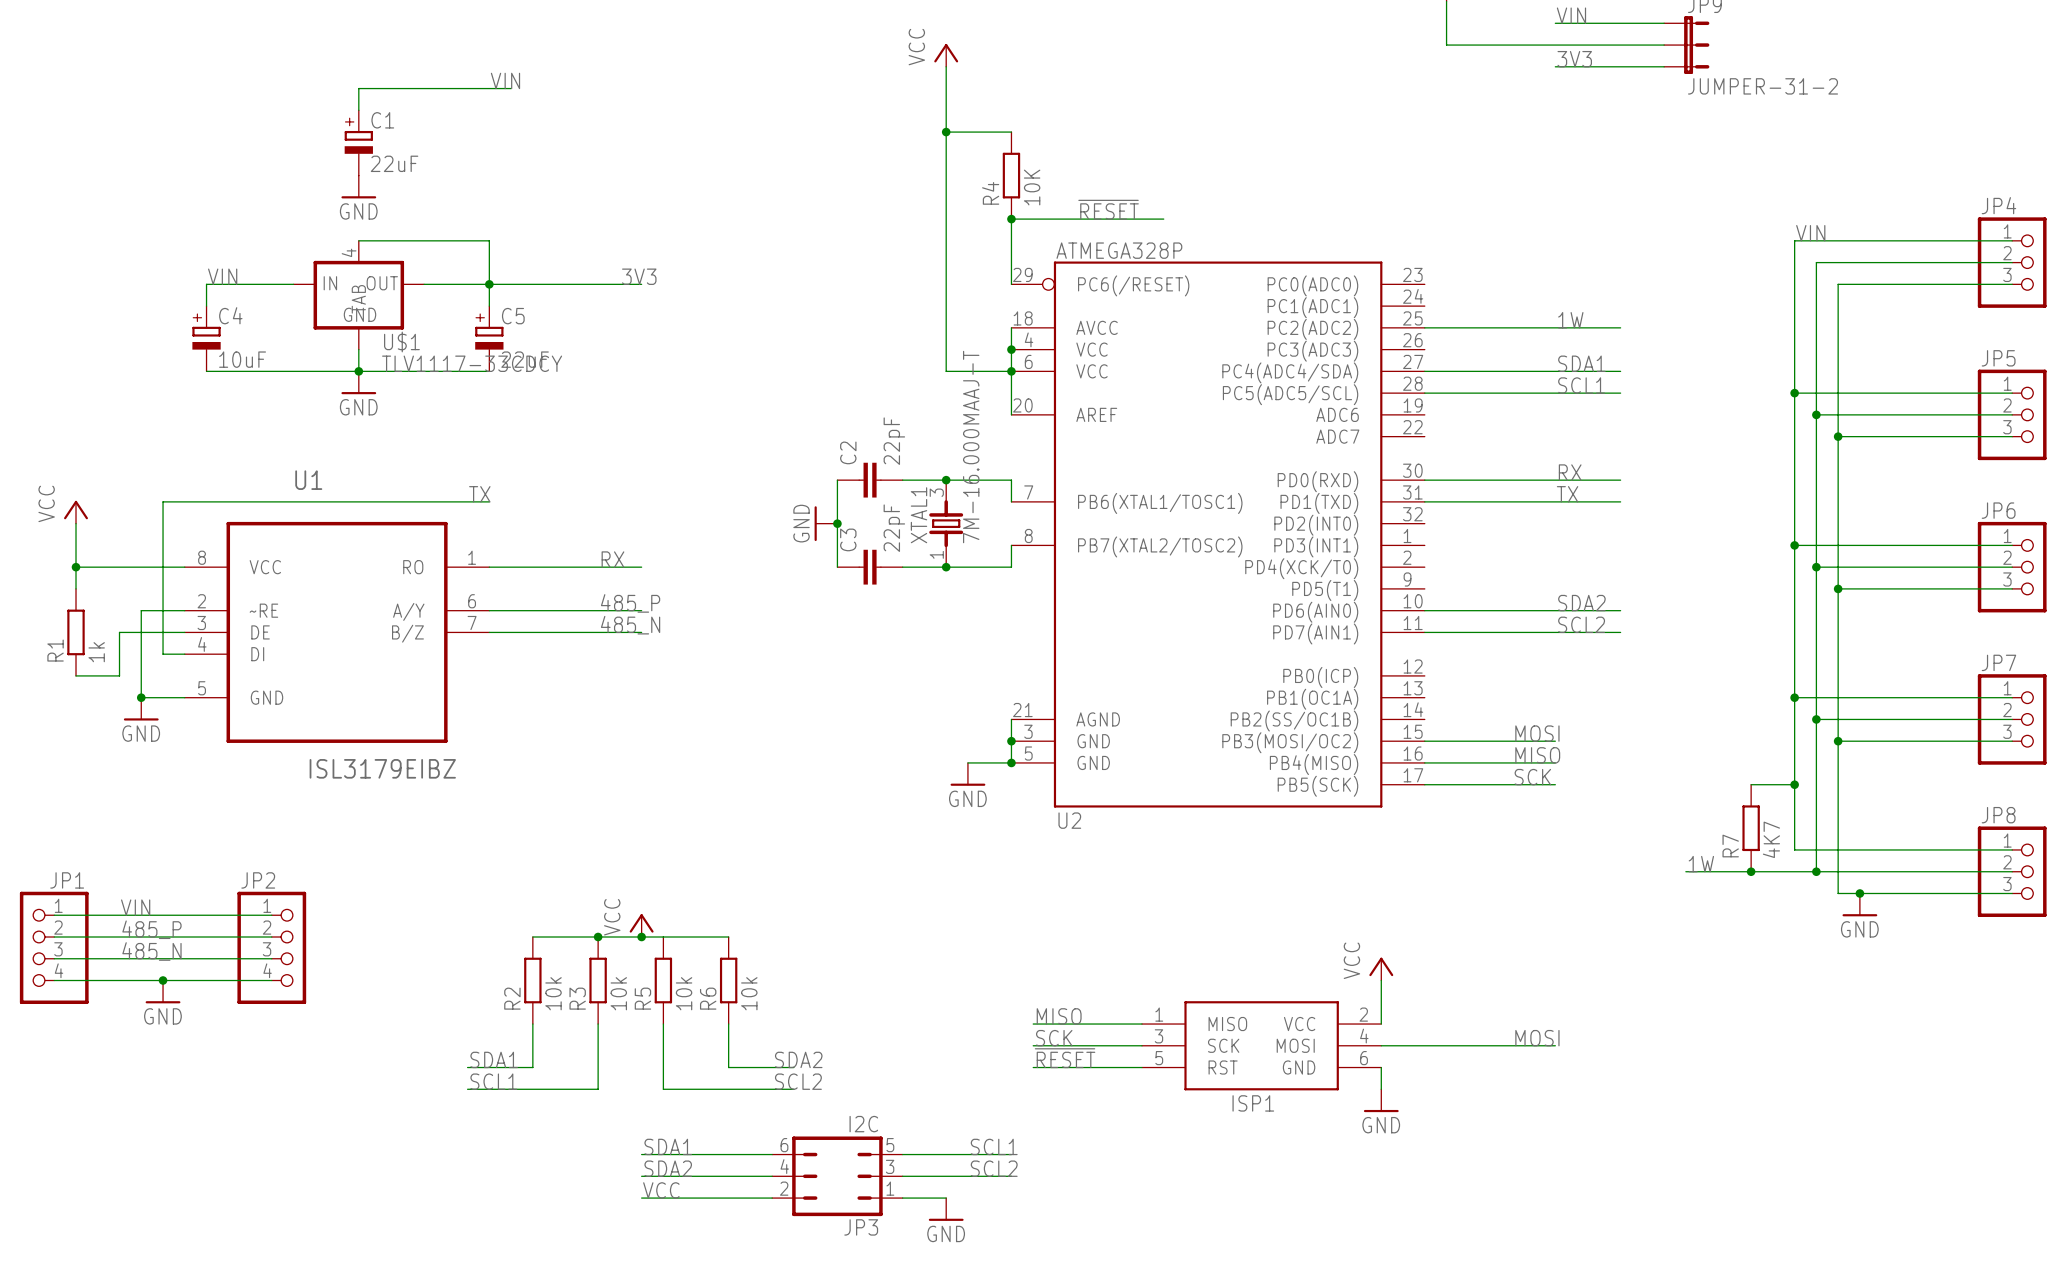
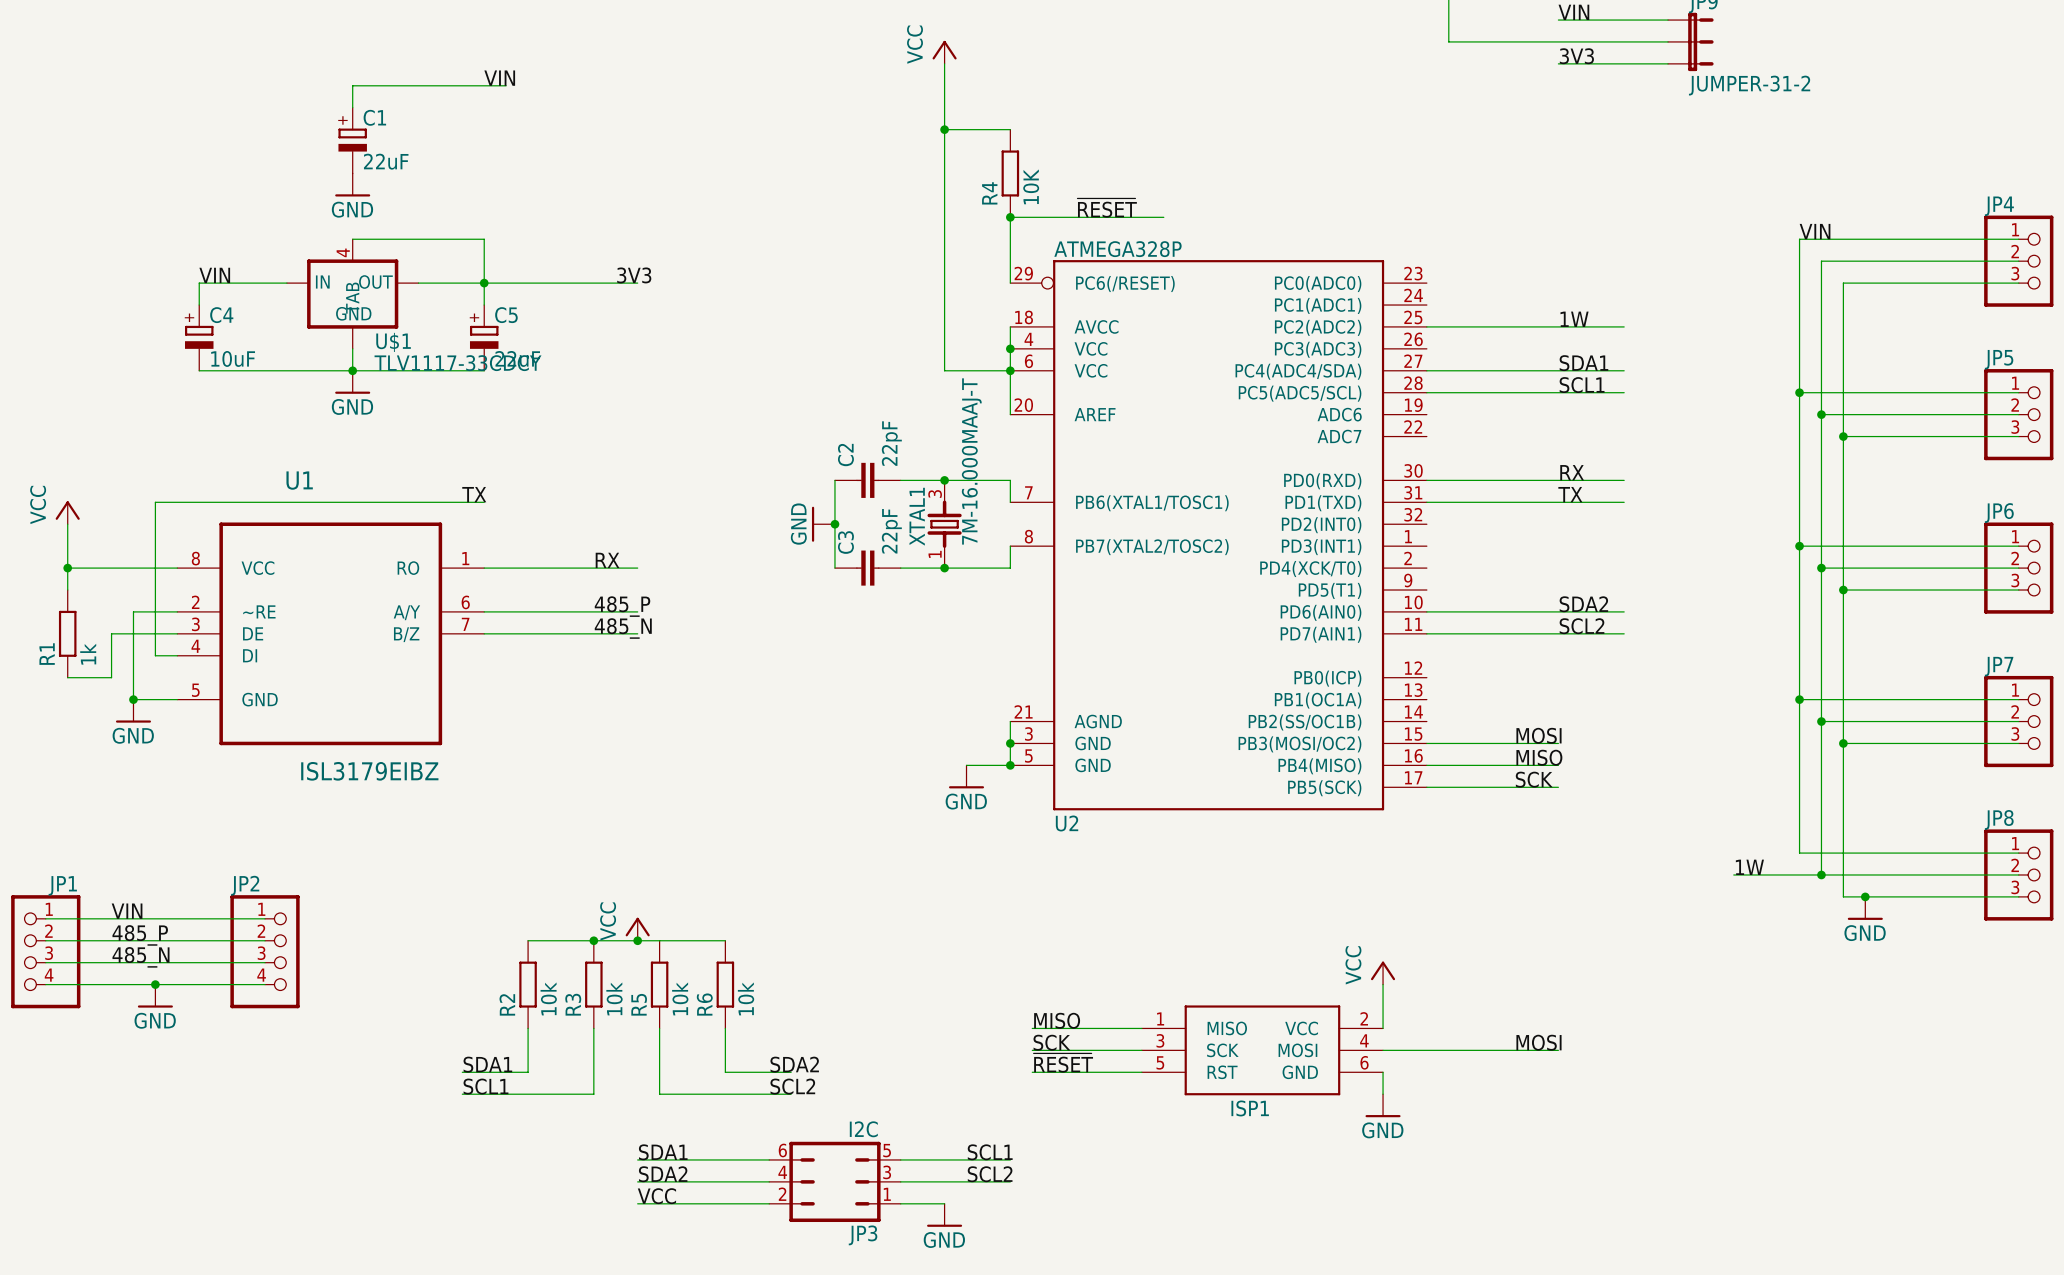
wire: (1751, 784) (1794, 784) -> none
junction: (1794, 784) -> none
R7: 4K7 (1751, 828) -> none
label position: 1W (1701, 864) -> 1W (1749, 867)
wire: (1685, 871) (1729, 871) -> none
junction: (1751, 871) -> none

